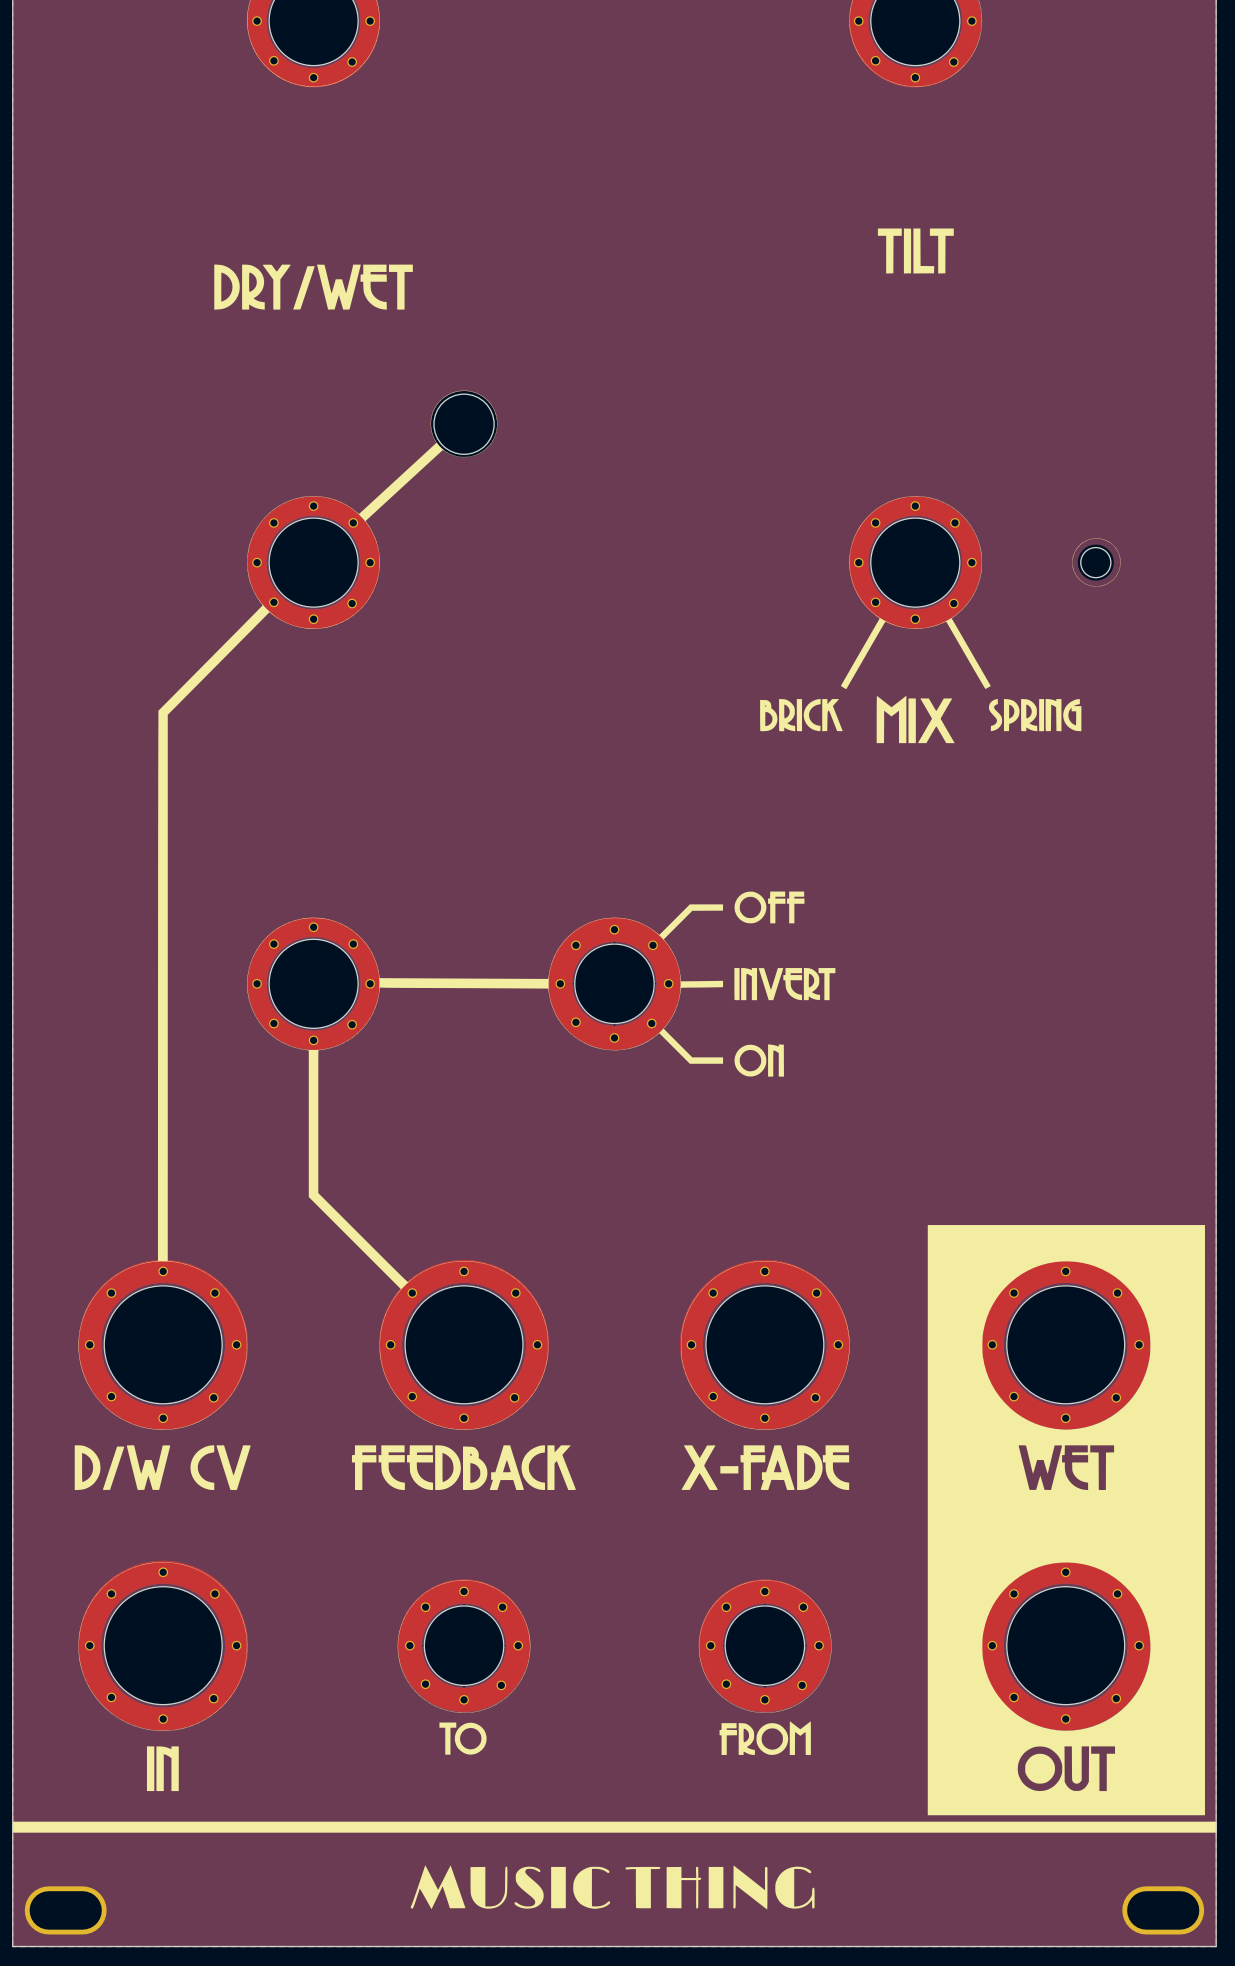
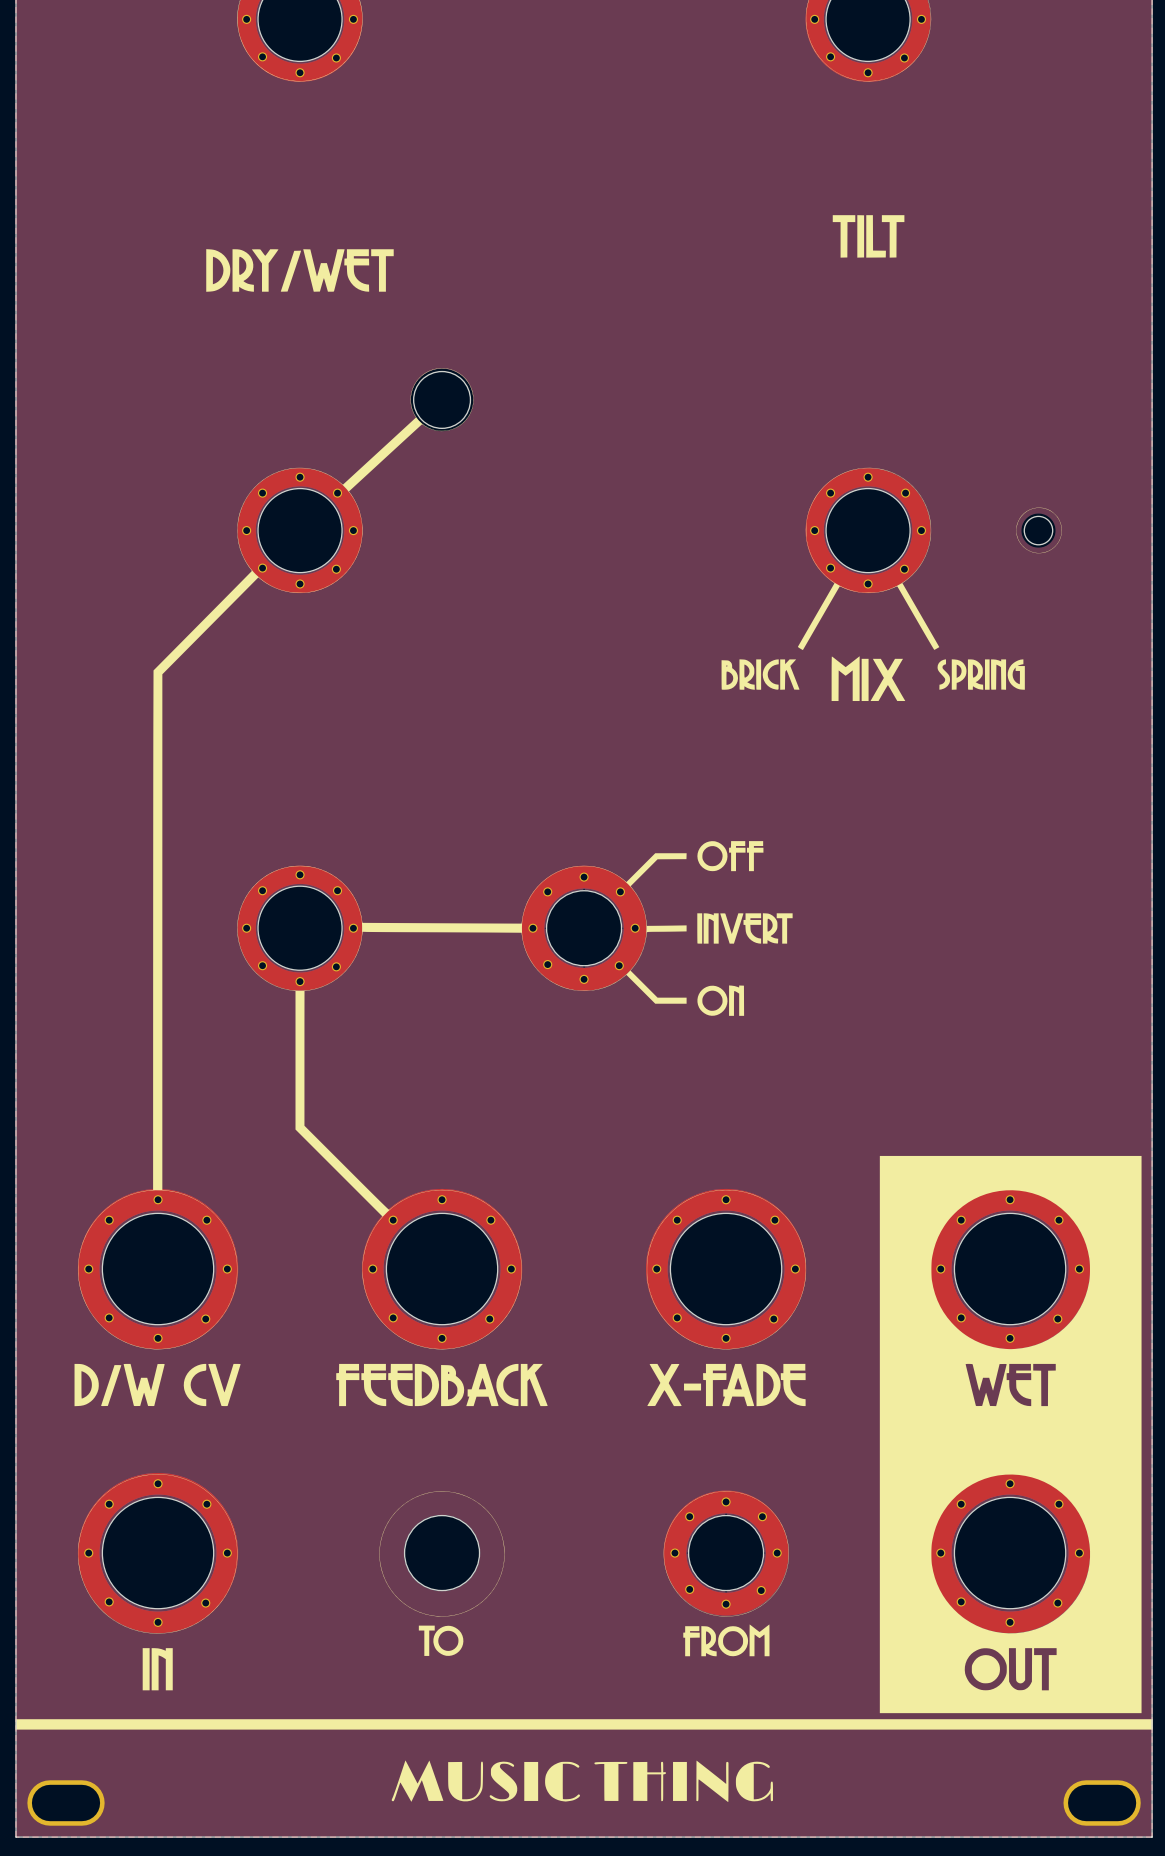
drawing: none -> [404, 1515, 480, 1591]
part: (464, 1645) -> none

